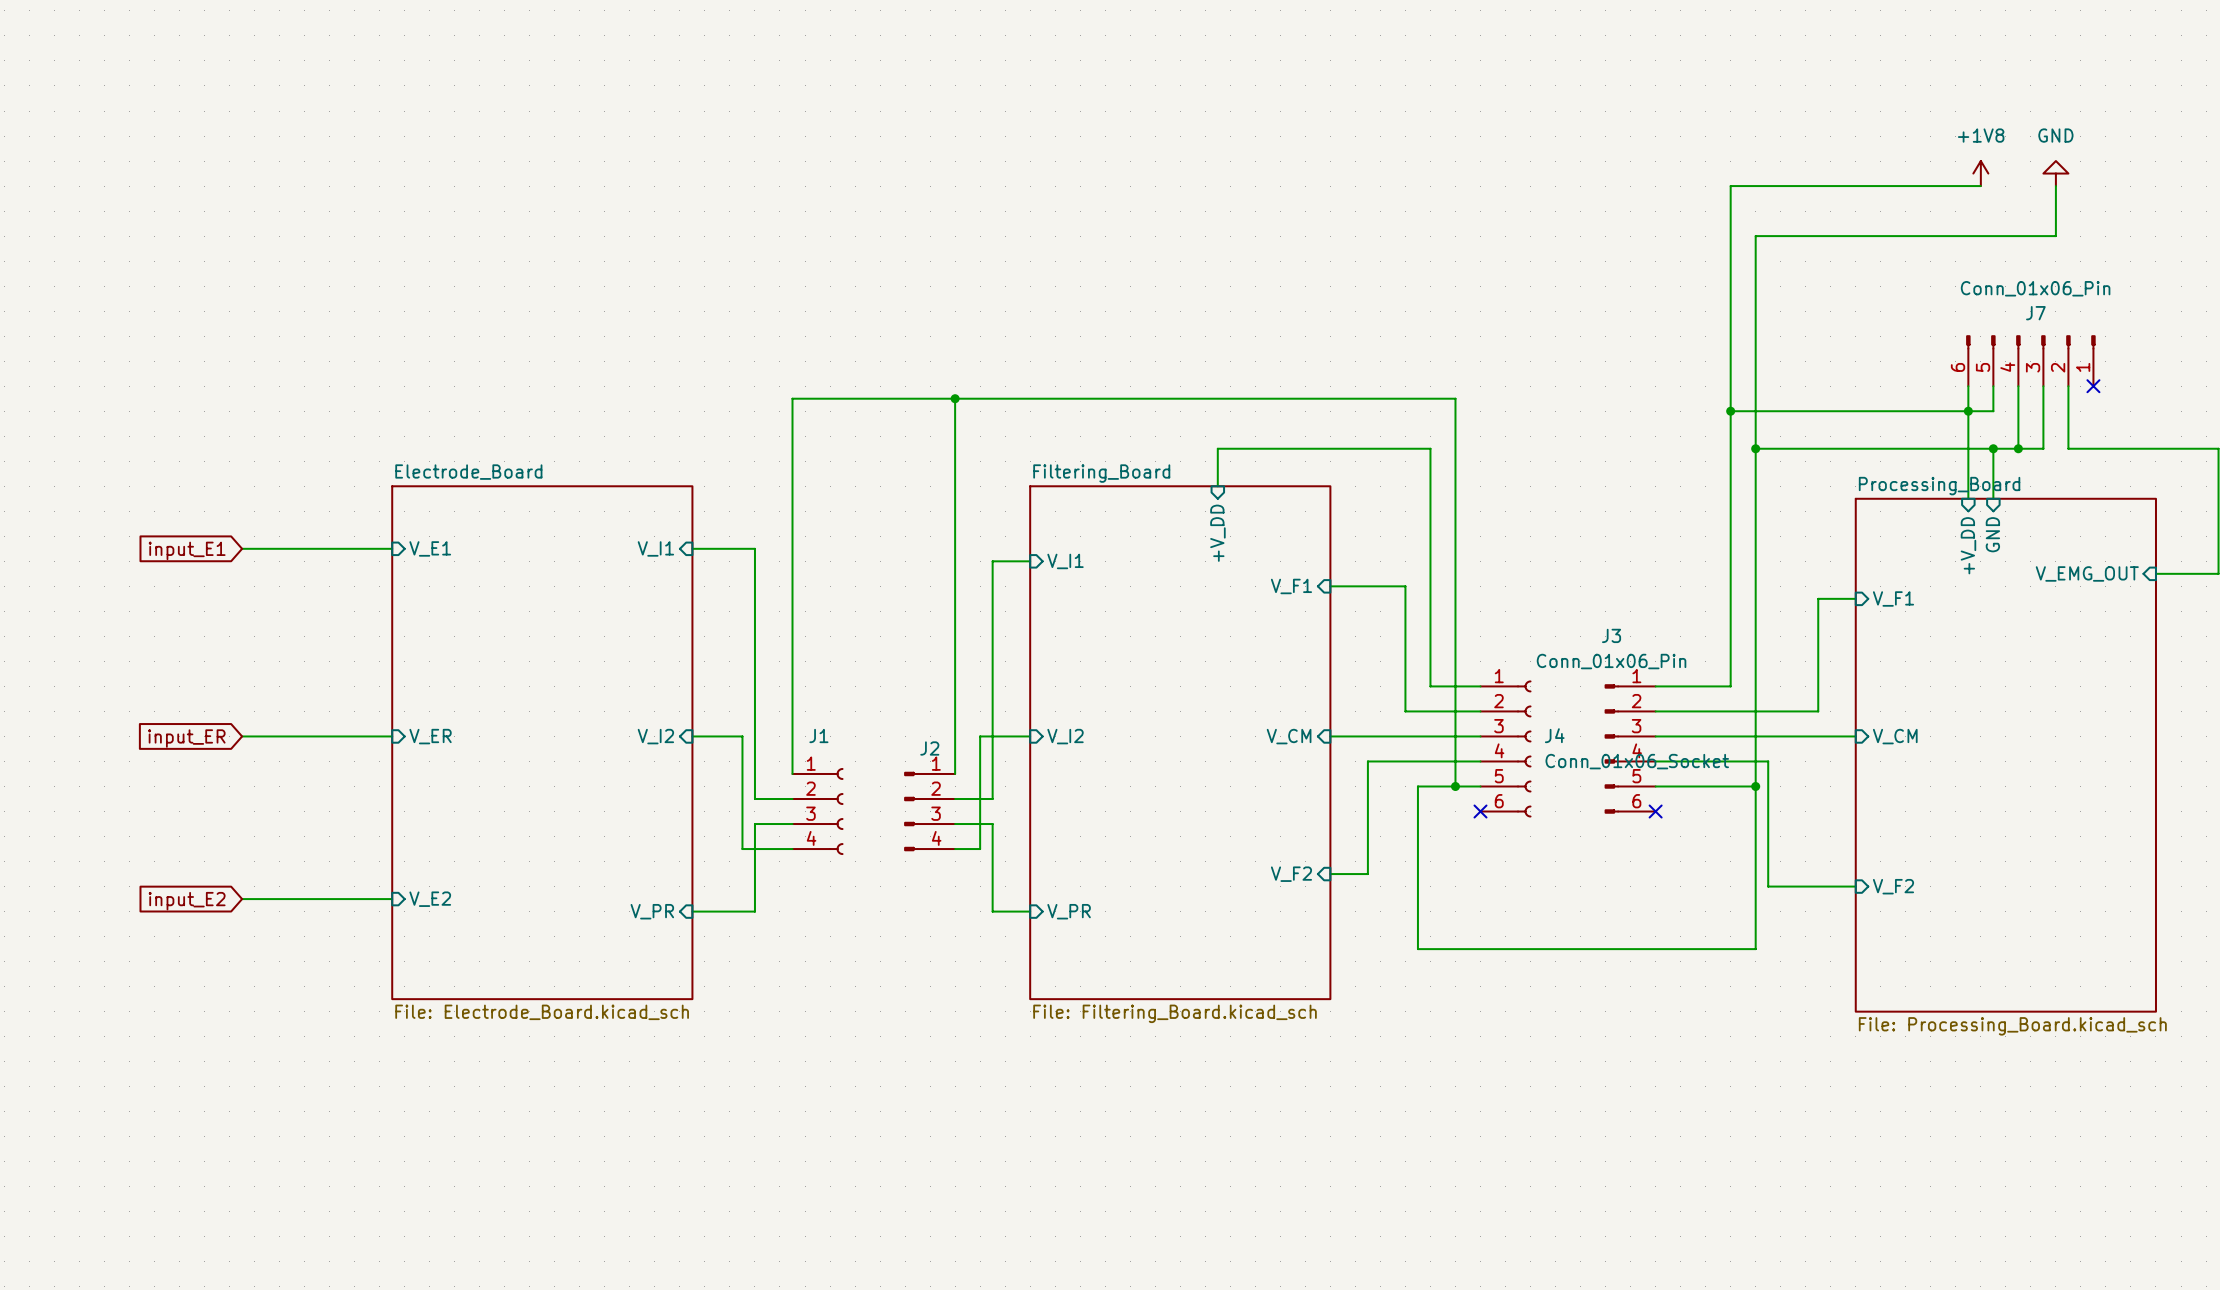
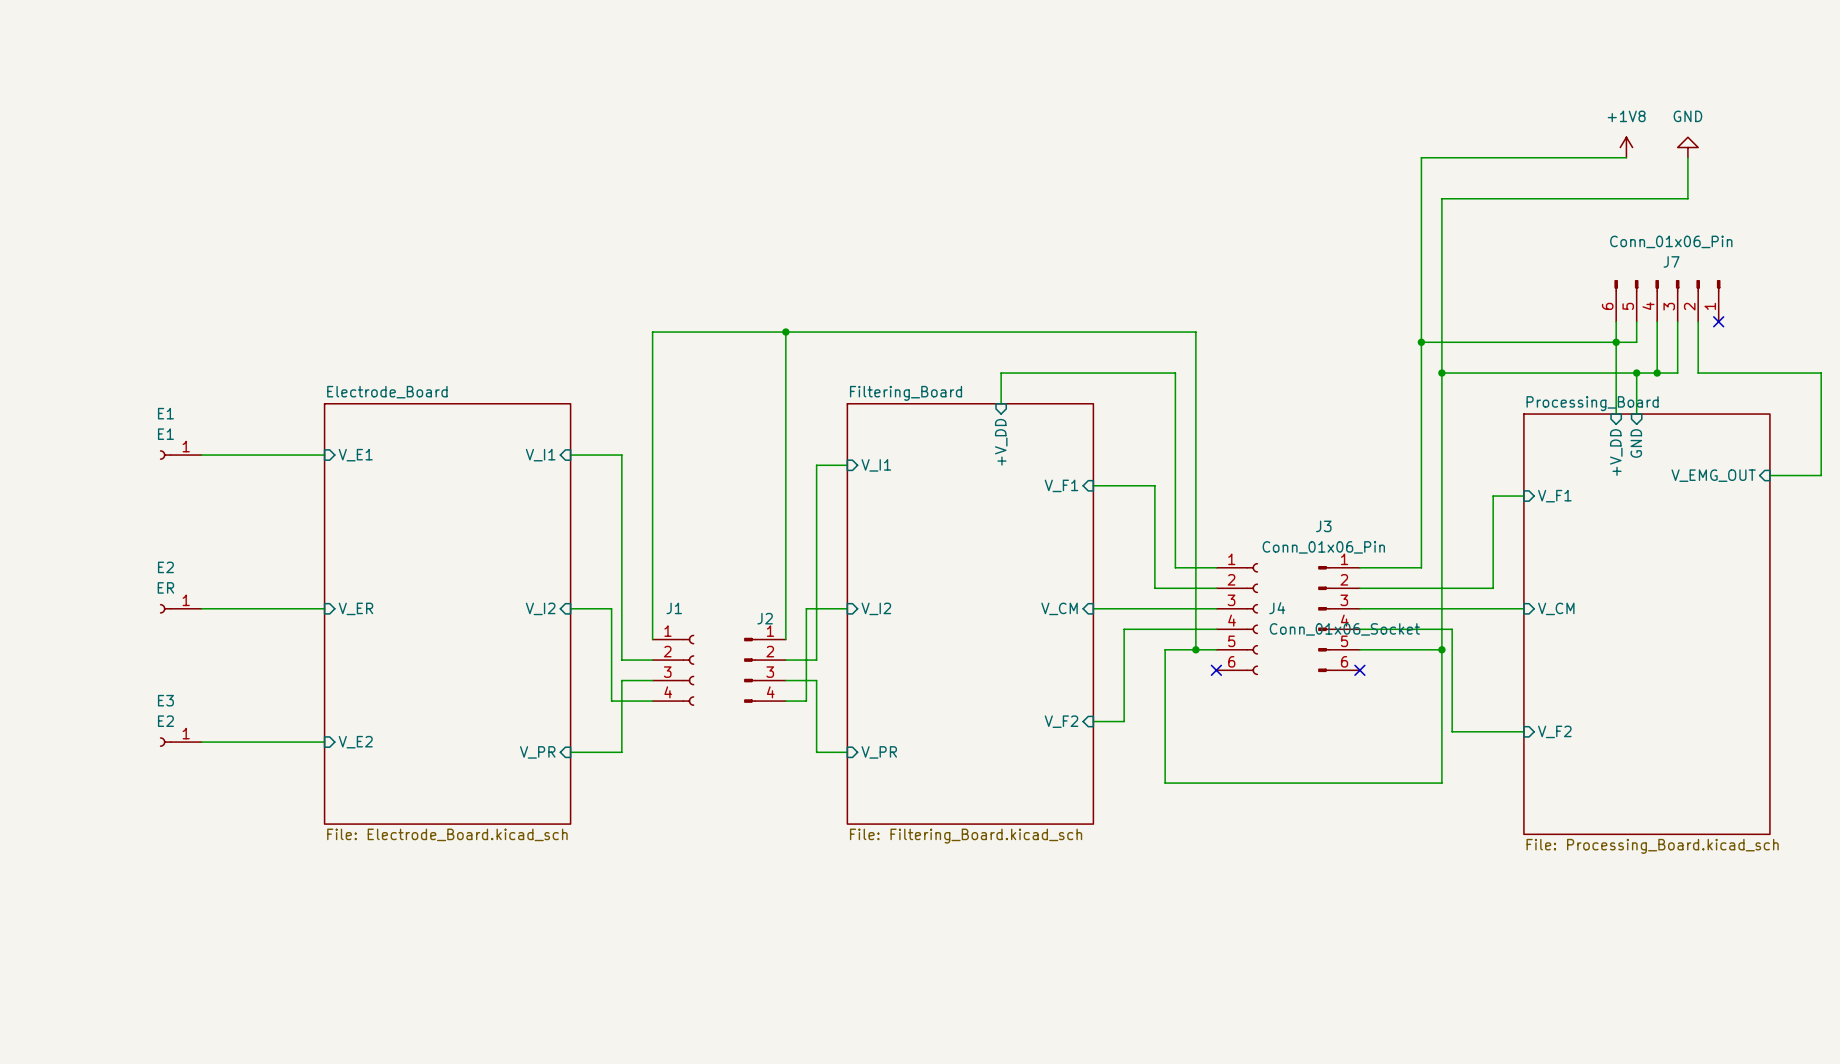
E1: none -> E1 (180, 455)
global label: input_E1 (187, 550) -> none
E2: none -> ER (180, 608)
global label: input_ER (186, 738) -> none
E3: none -> E2 (180, 742)
global label: input_E2 (187, 901) -> none

